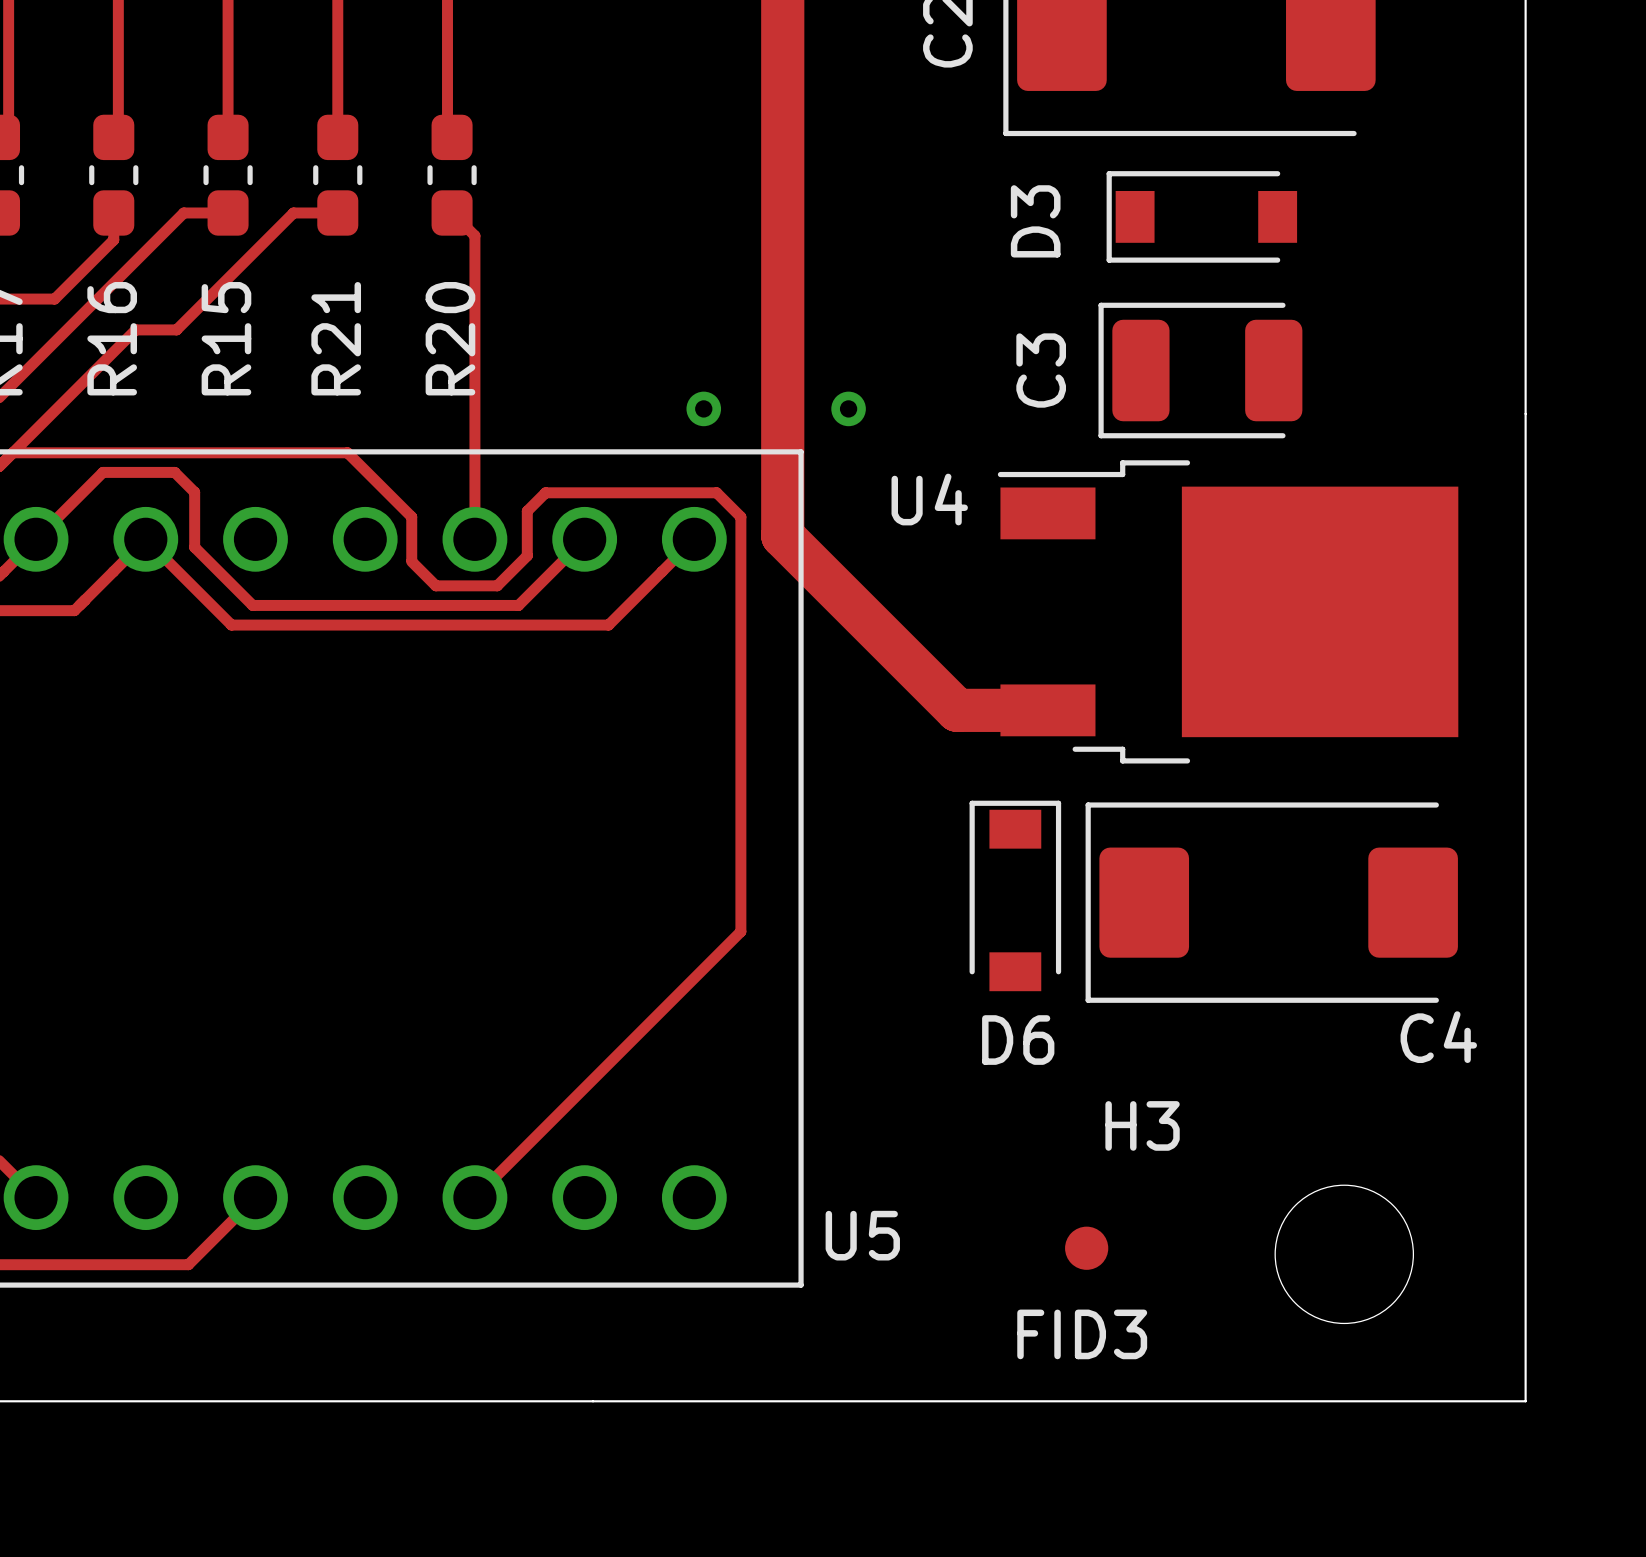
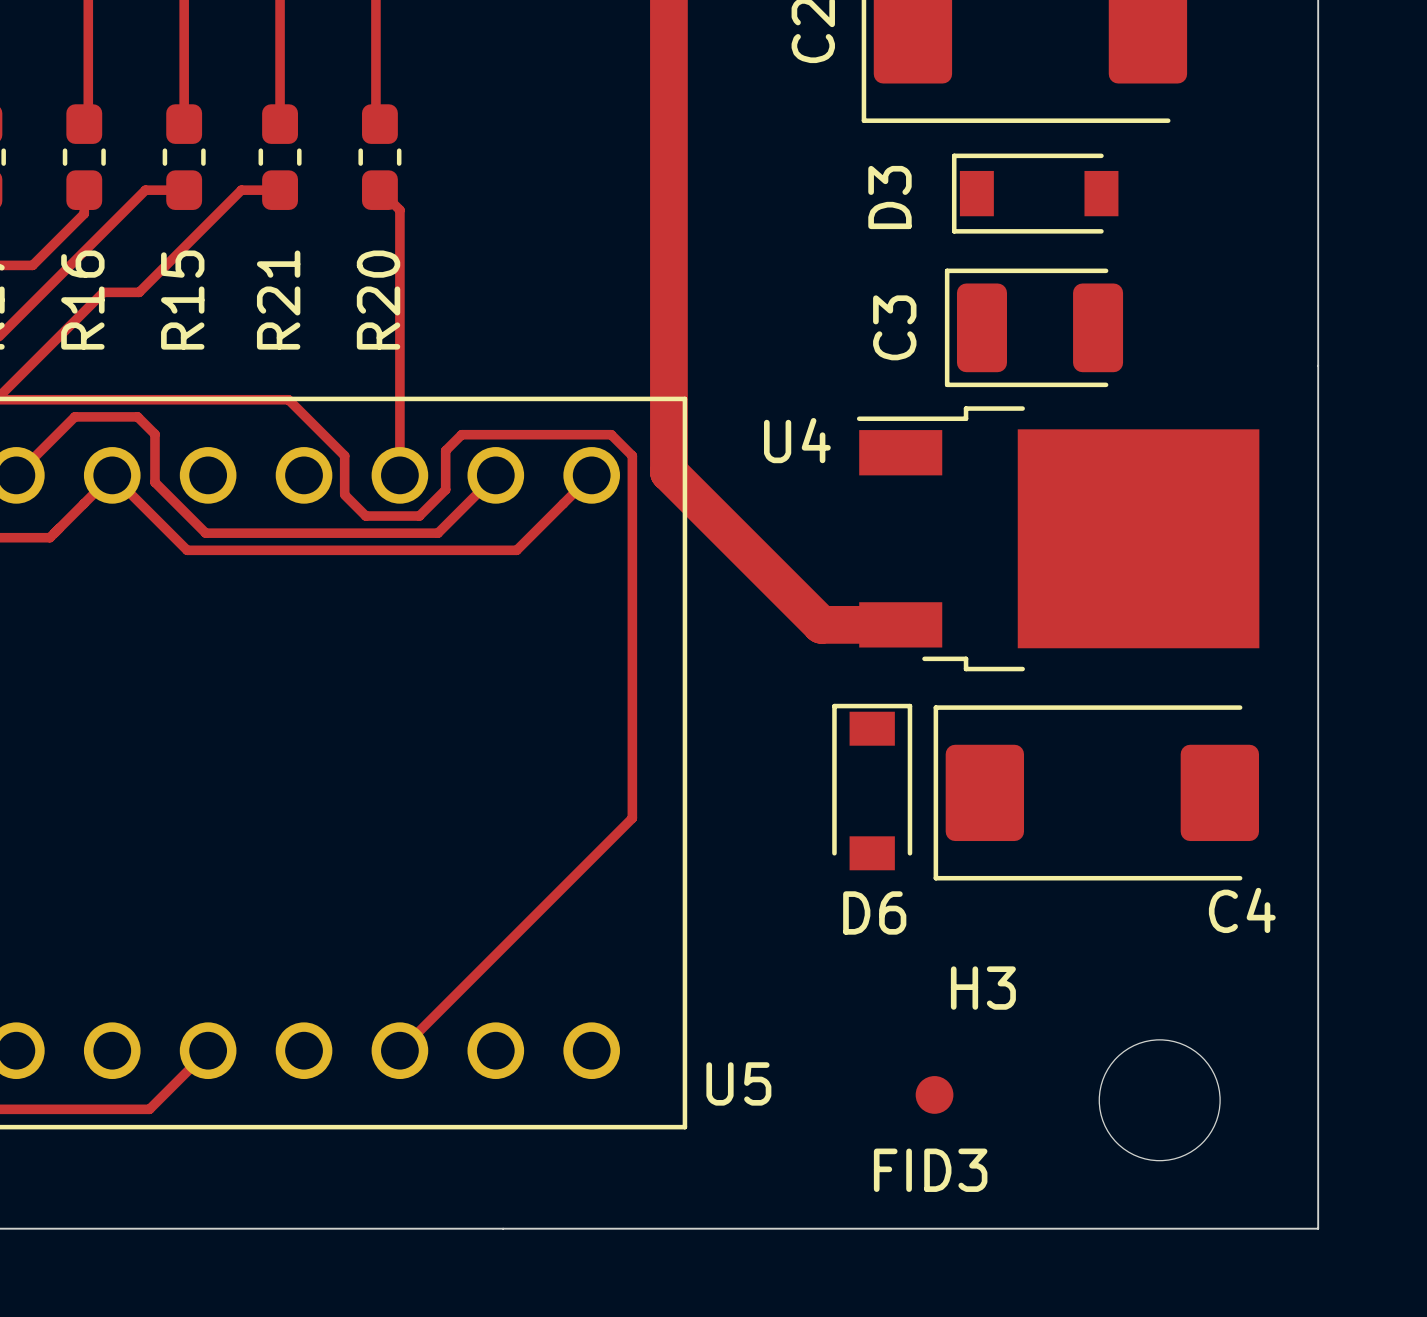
via: (703, 408) -> none
via: (848, 408) -> none

